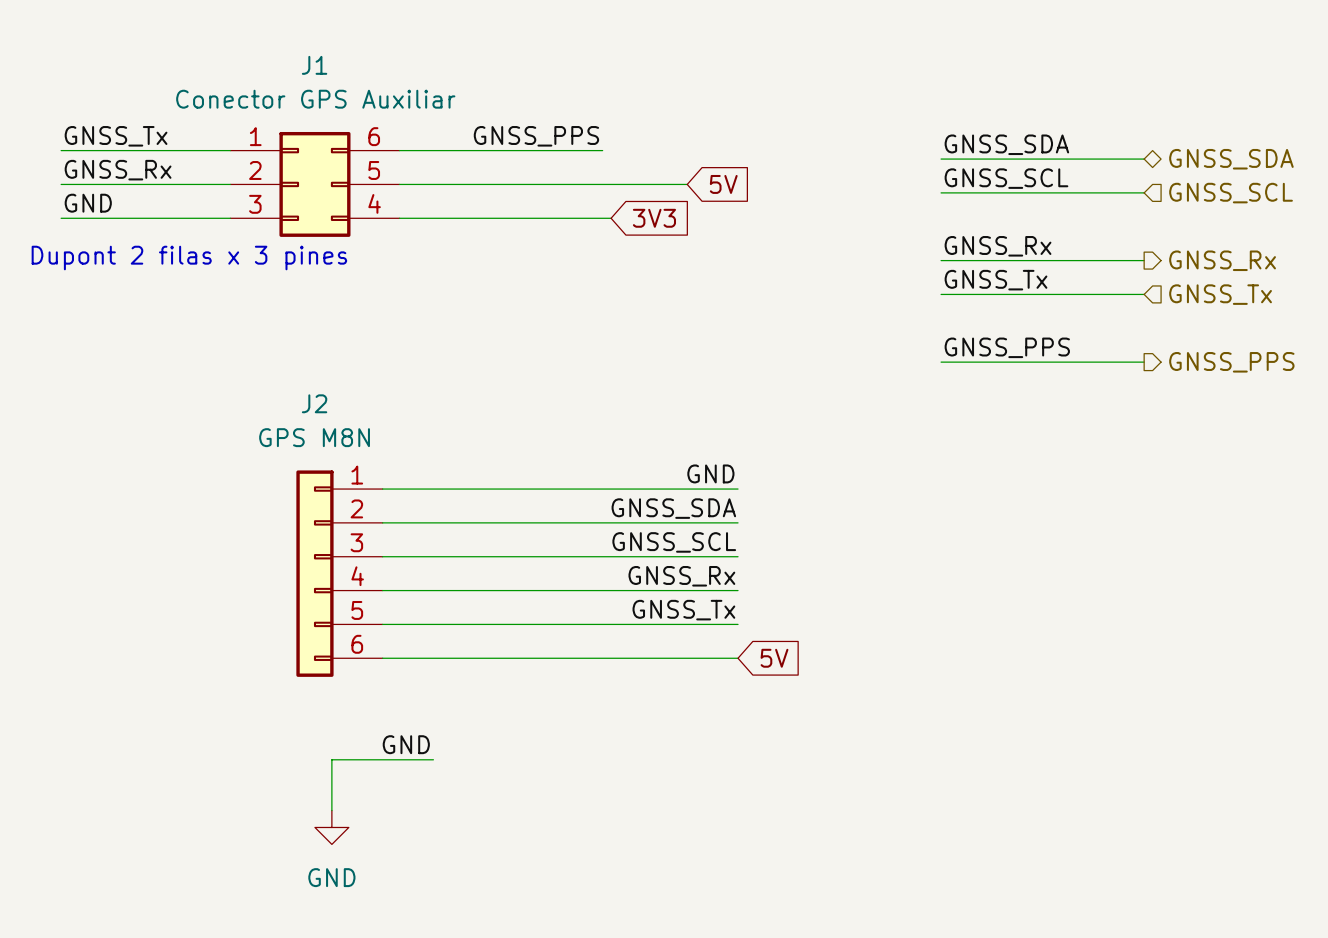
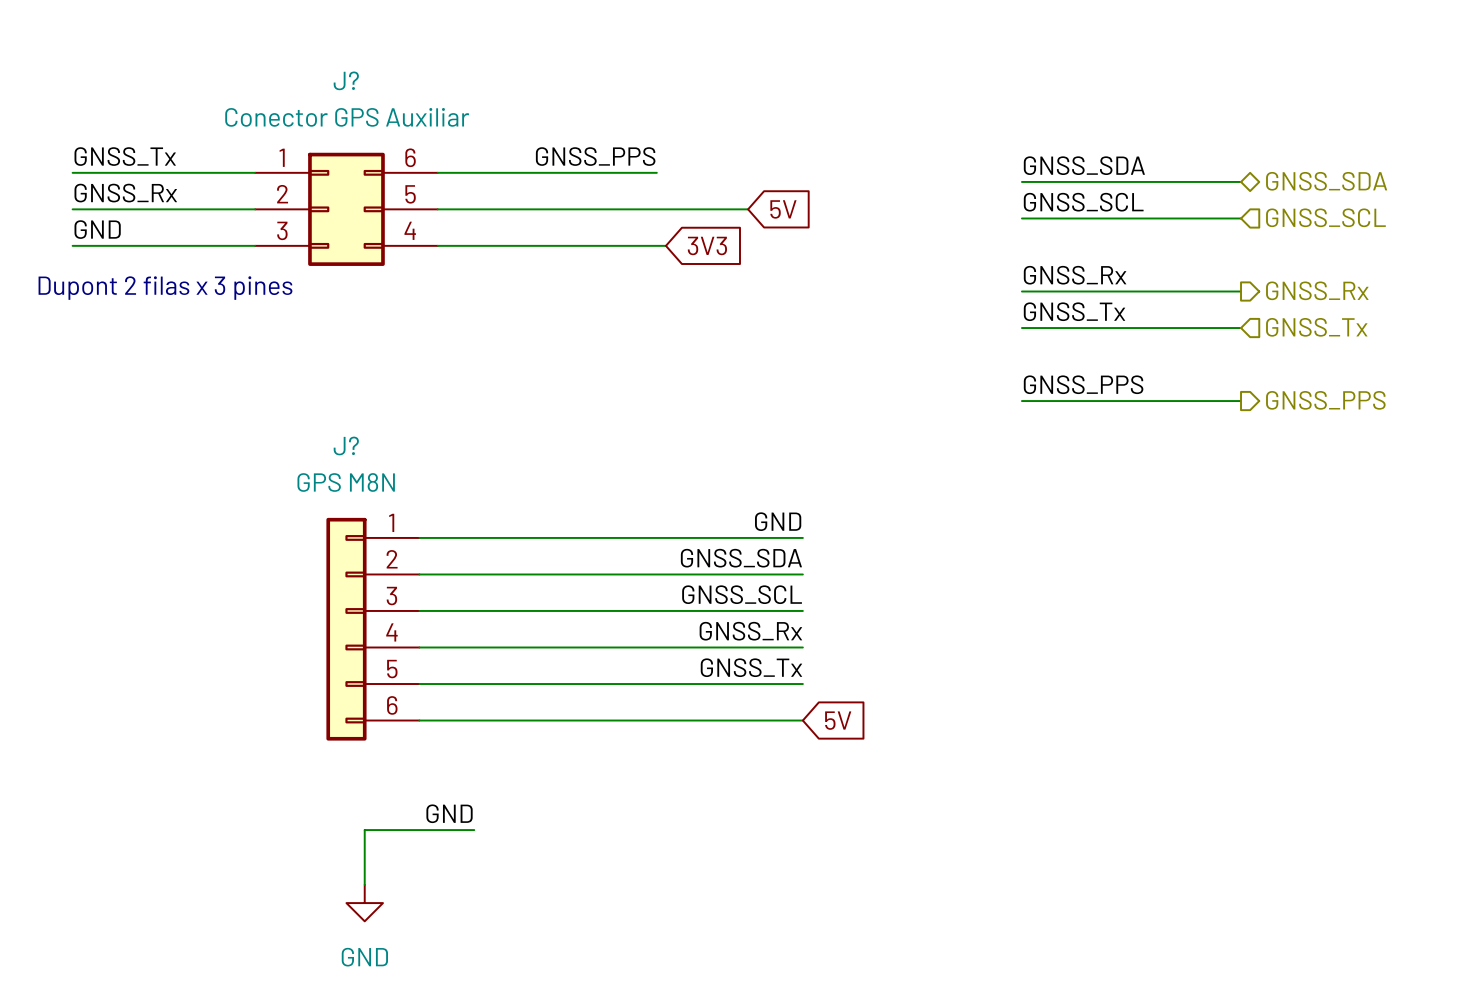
J1 name: J1 (314, 65) -> J? (346, 80)
J2 name: J2 (314, 403) -> J? (346, 445)

